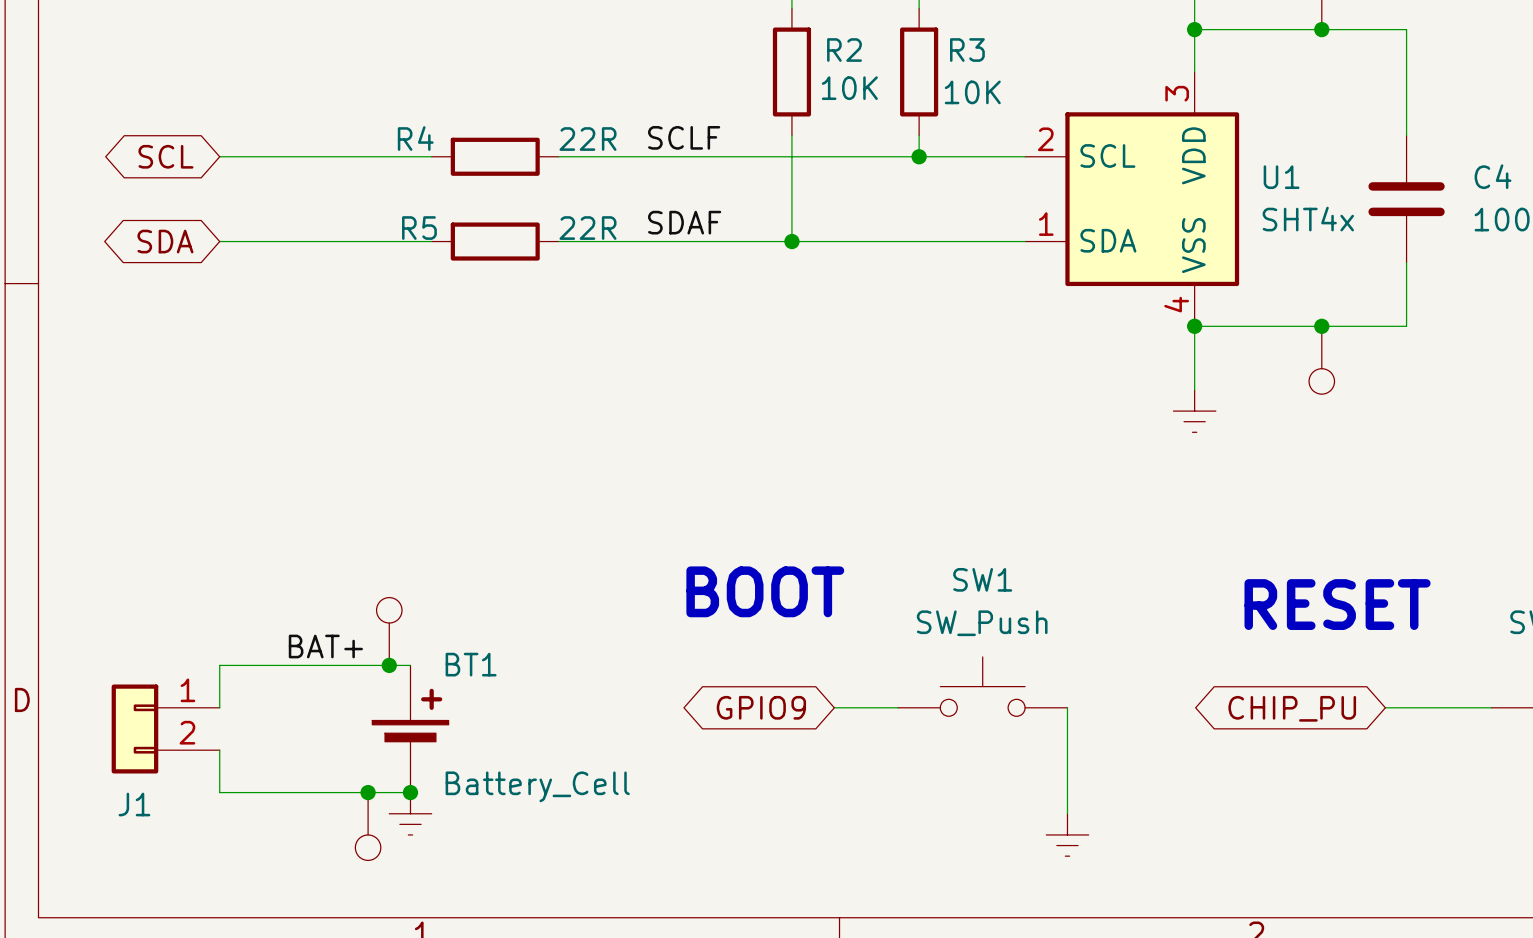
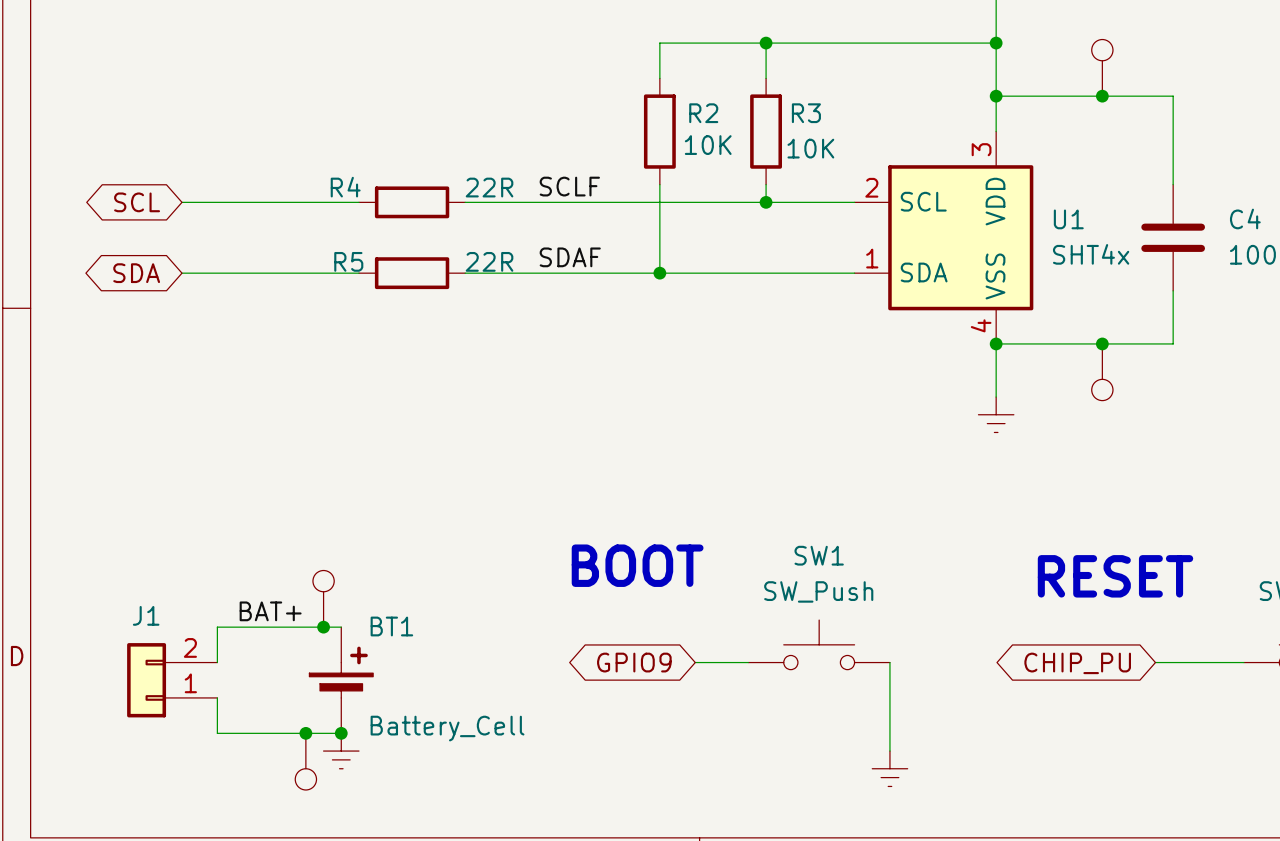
wire: (262, 665) (219, 665) (219, 707) -> (217, 627) (217, 662)
J1 flip: as is (134, 728) -> up-down (146, 680)
wire: (219, 750) (219, 792) (262, 792) -> (217, 697) (217, 733)

